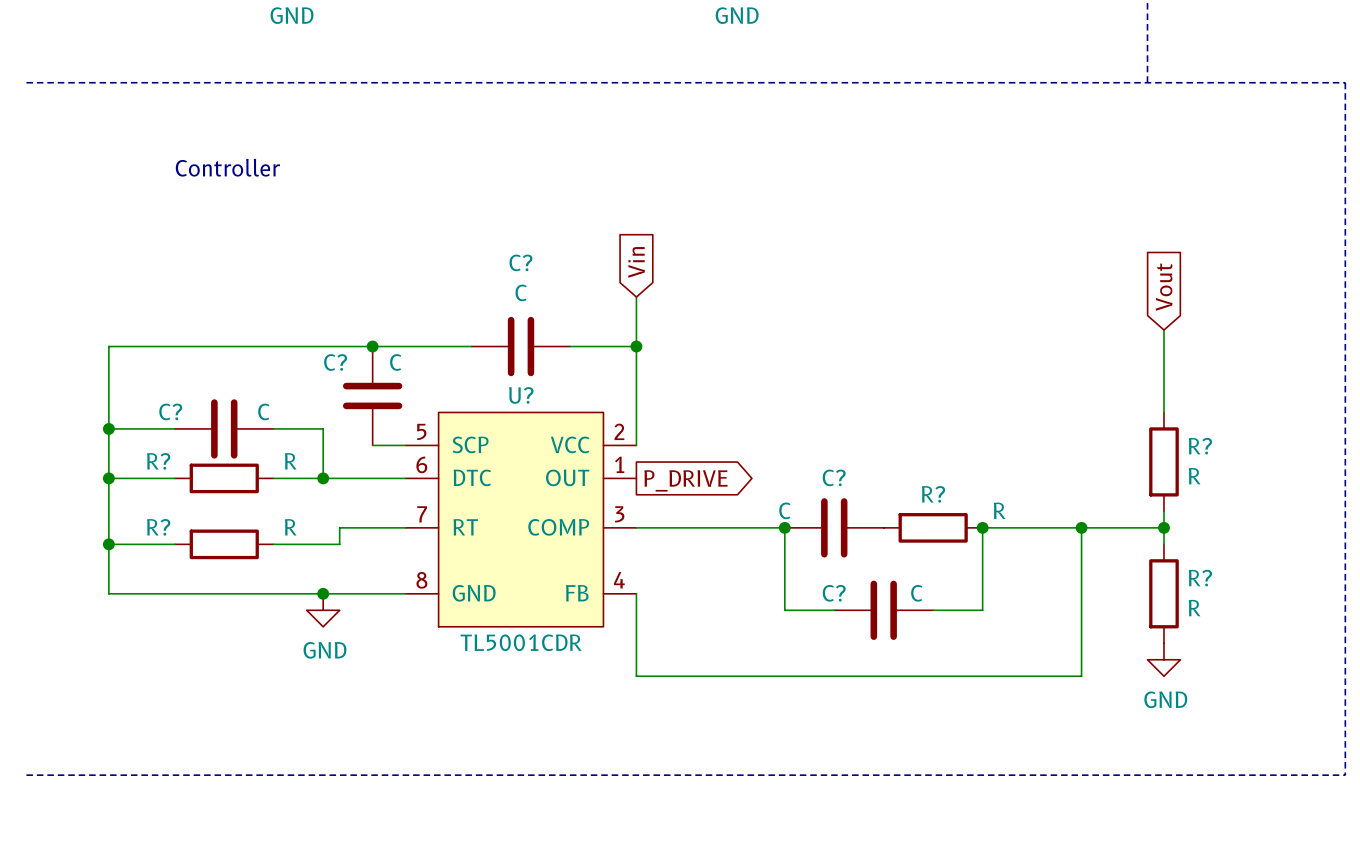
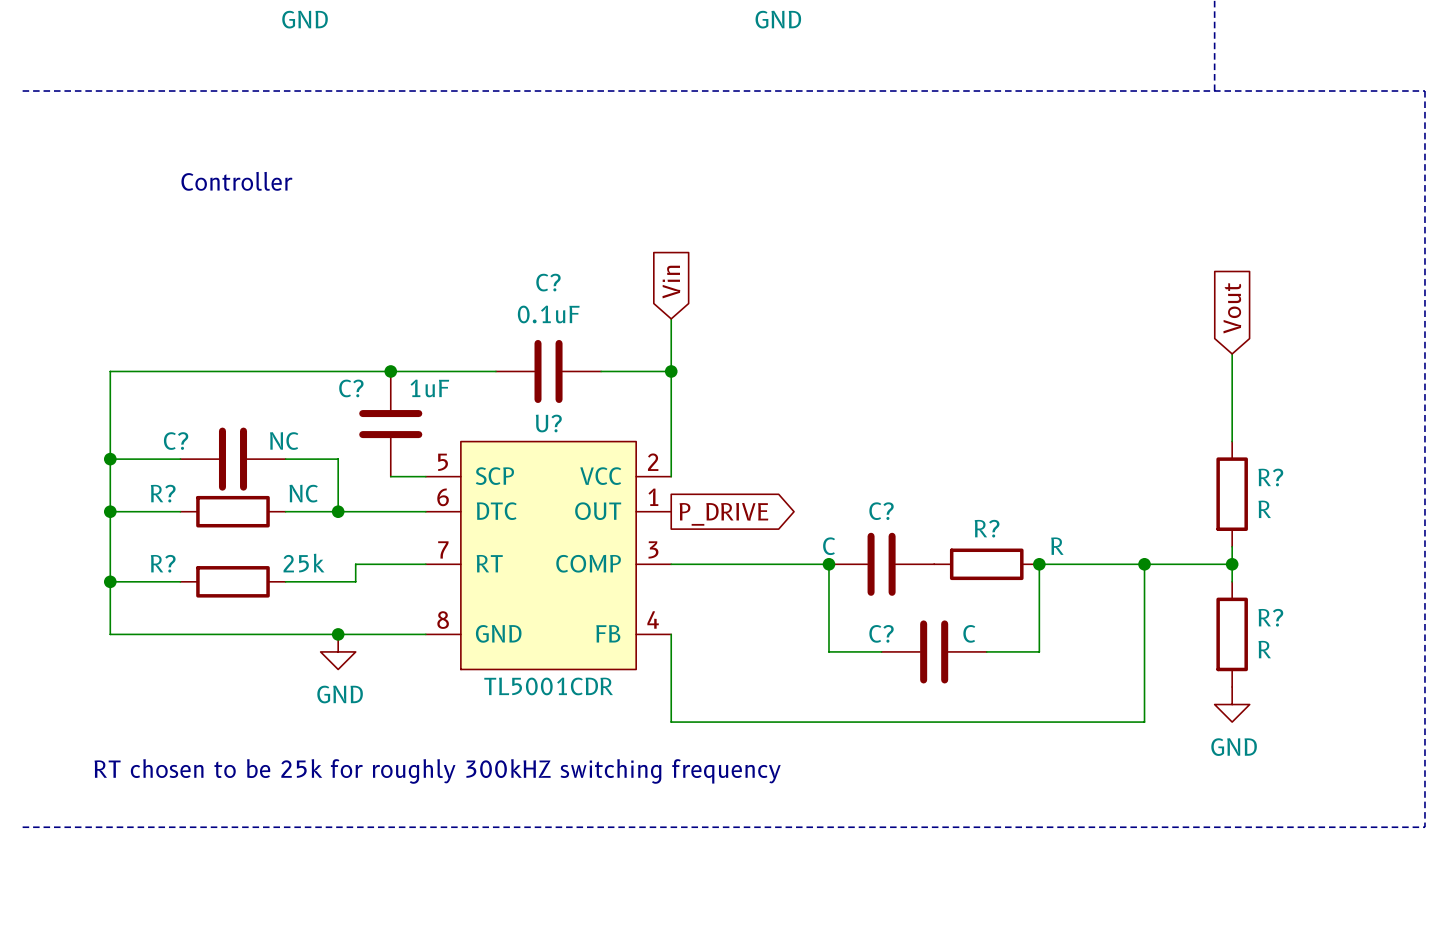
C? value: C (521, 292) -> 0.1uF (548, 314)
C? value: C (395, 362) -> 1uF (429, 388)
C? value: C (263, 411) -> NC (284, 441)
R? value: R (290, 461) -> NC (303, 493)
R? value: R (290, 527) -> 25k (303, 563)
text: none -> RT chosen to be 25k for roughly 300kHZ switching frequency (437, 771)

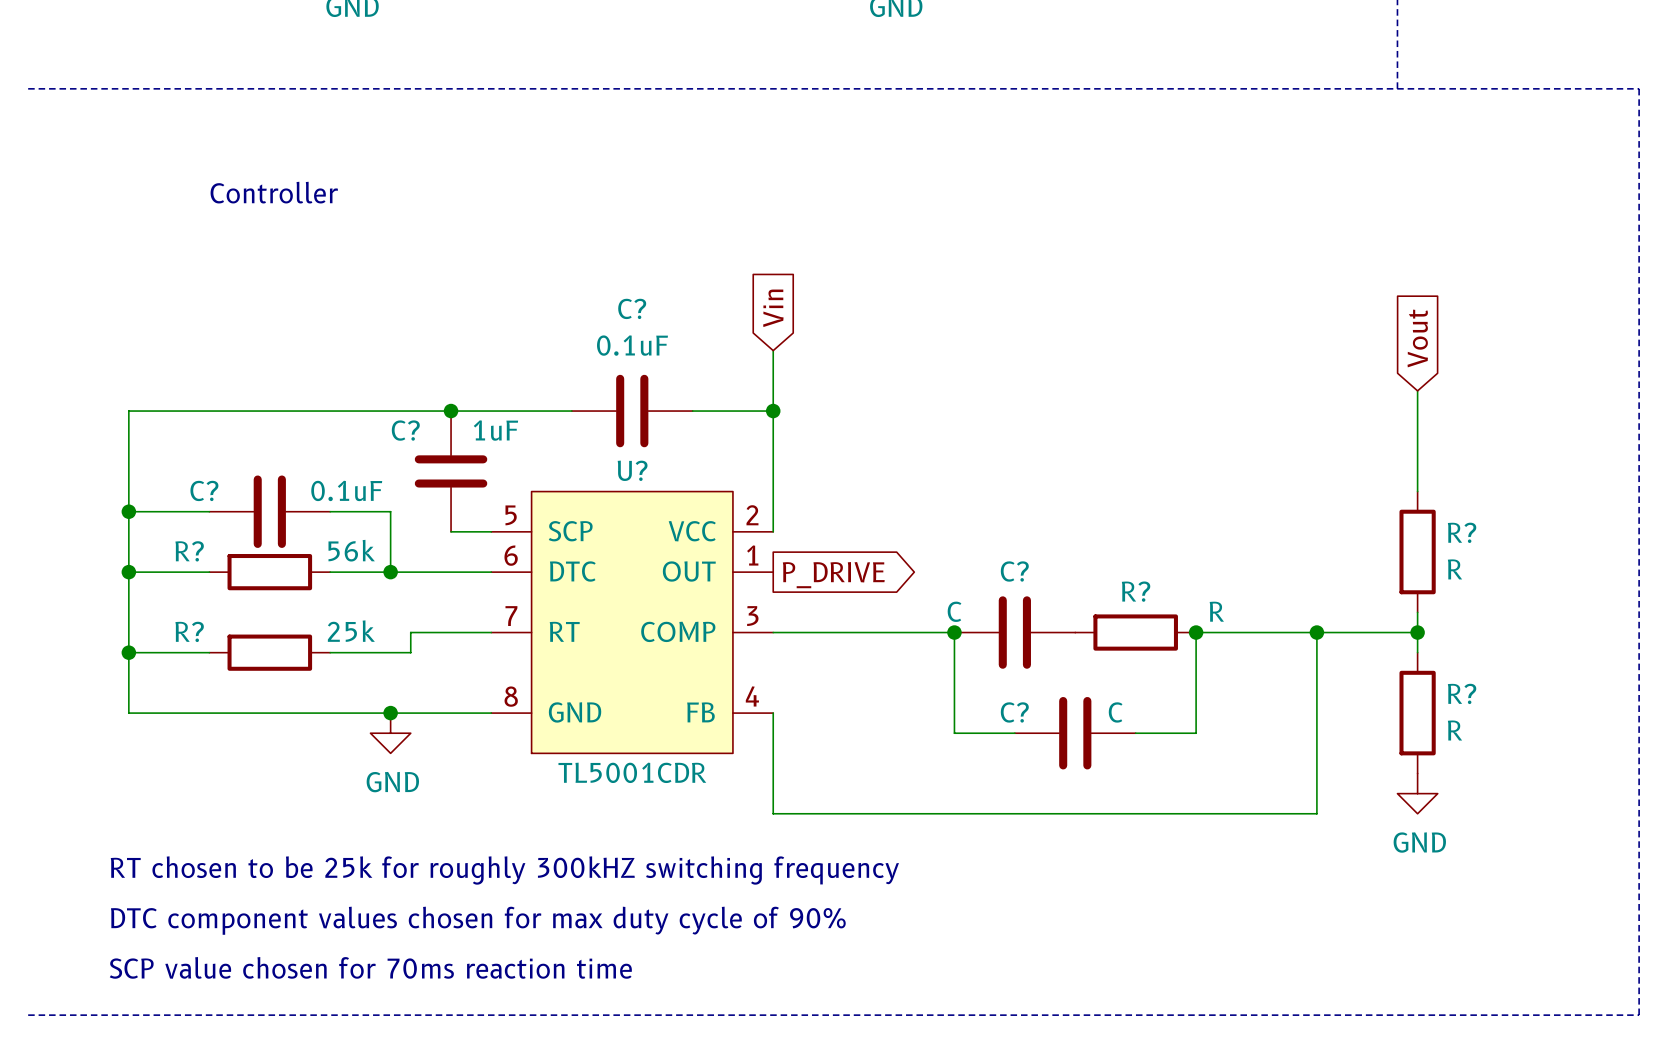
C? value: NC (284, 441) -> 0.1uF (346, 490)
R? value: NC (303, 493) -> 56k (351, 550)
text: none -> DTC component values chosen for max duty cycle of 90% (478, 920)
line: (22, 827) (1424, 827) -> (28, 1015) (1639, 1015) (1639, 934)
text: none -> SCP value chosen for 70ms reaction time (370, 967)

